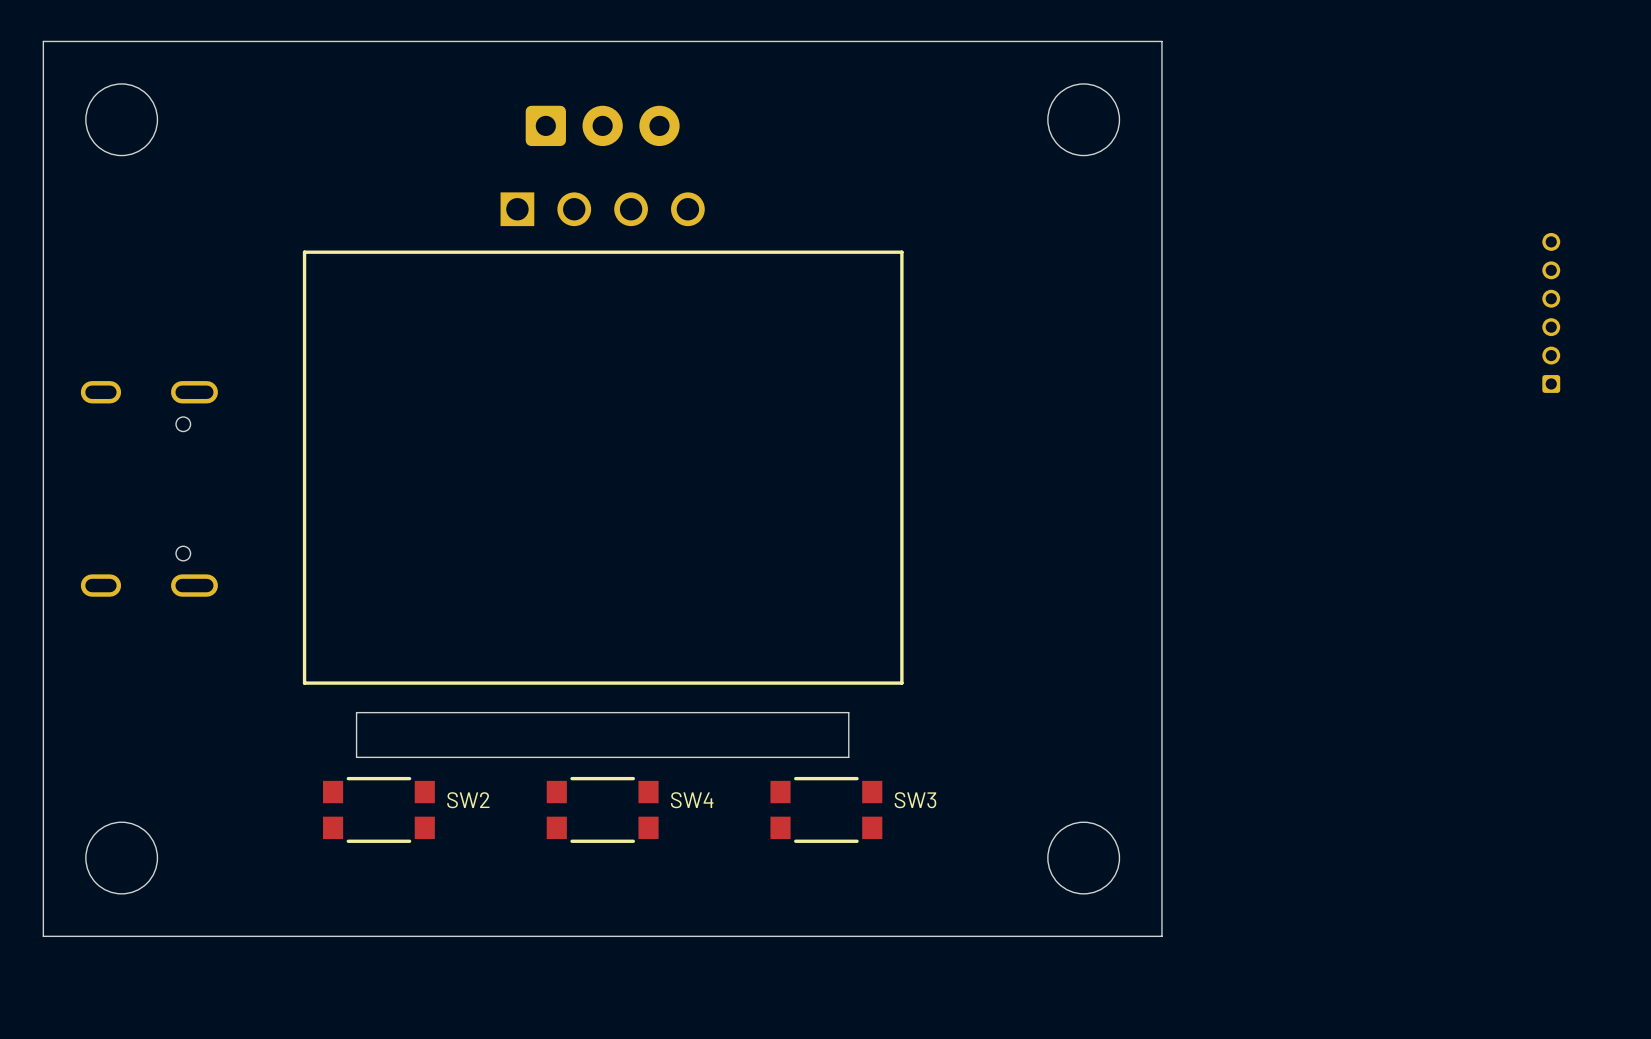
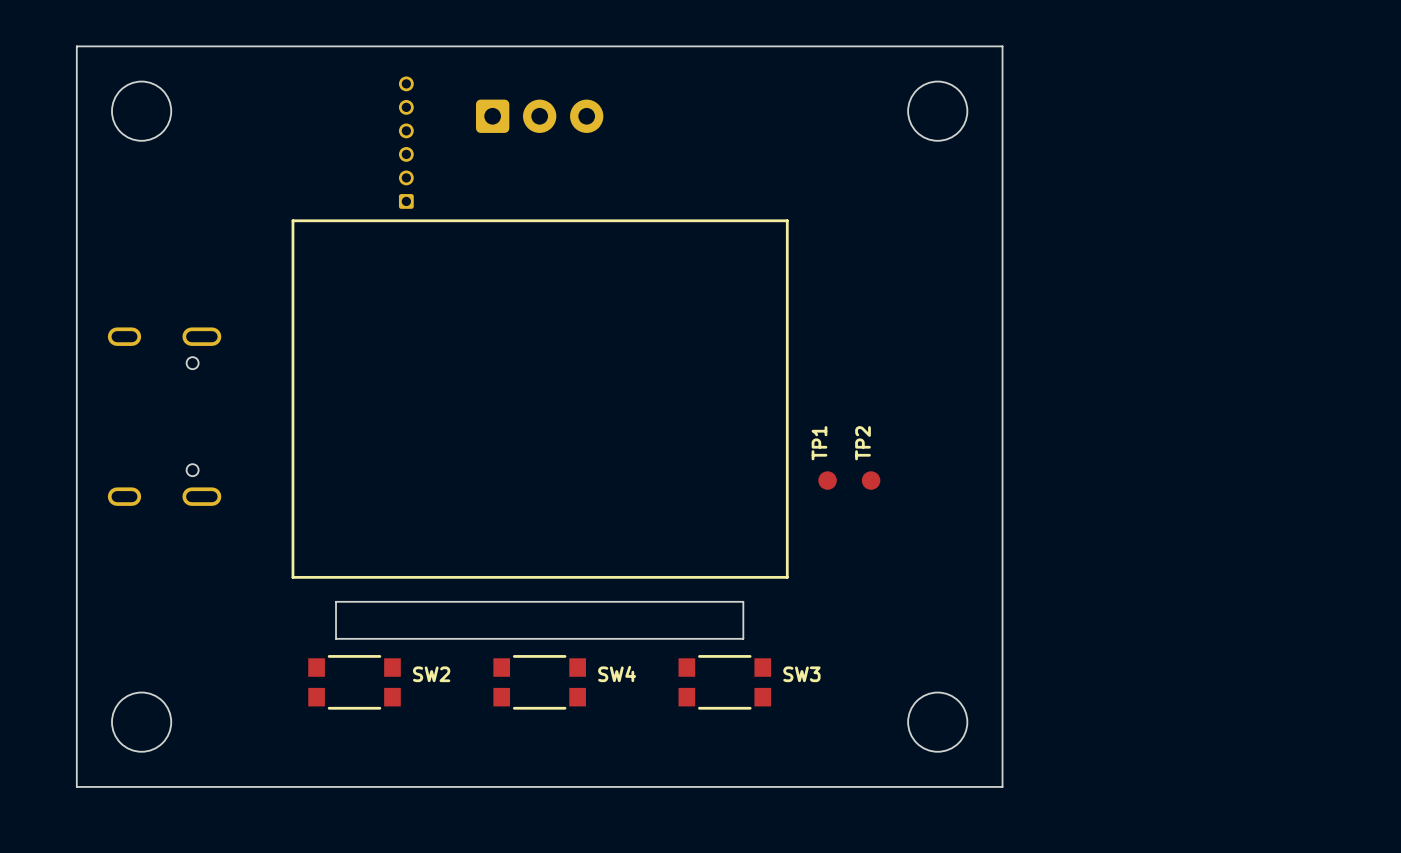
part: none -> (406, 142)
part: (602, 209) -> none
part: (1551, 312) -> none
TP1: none -> (827, 480)
TP2: none -> (871, 480)

